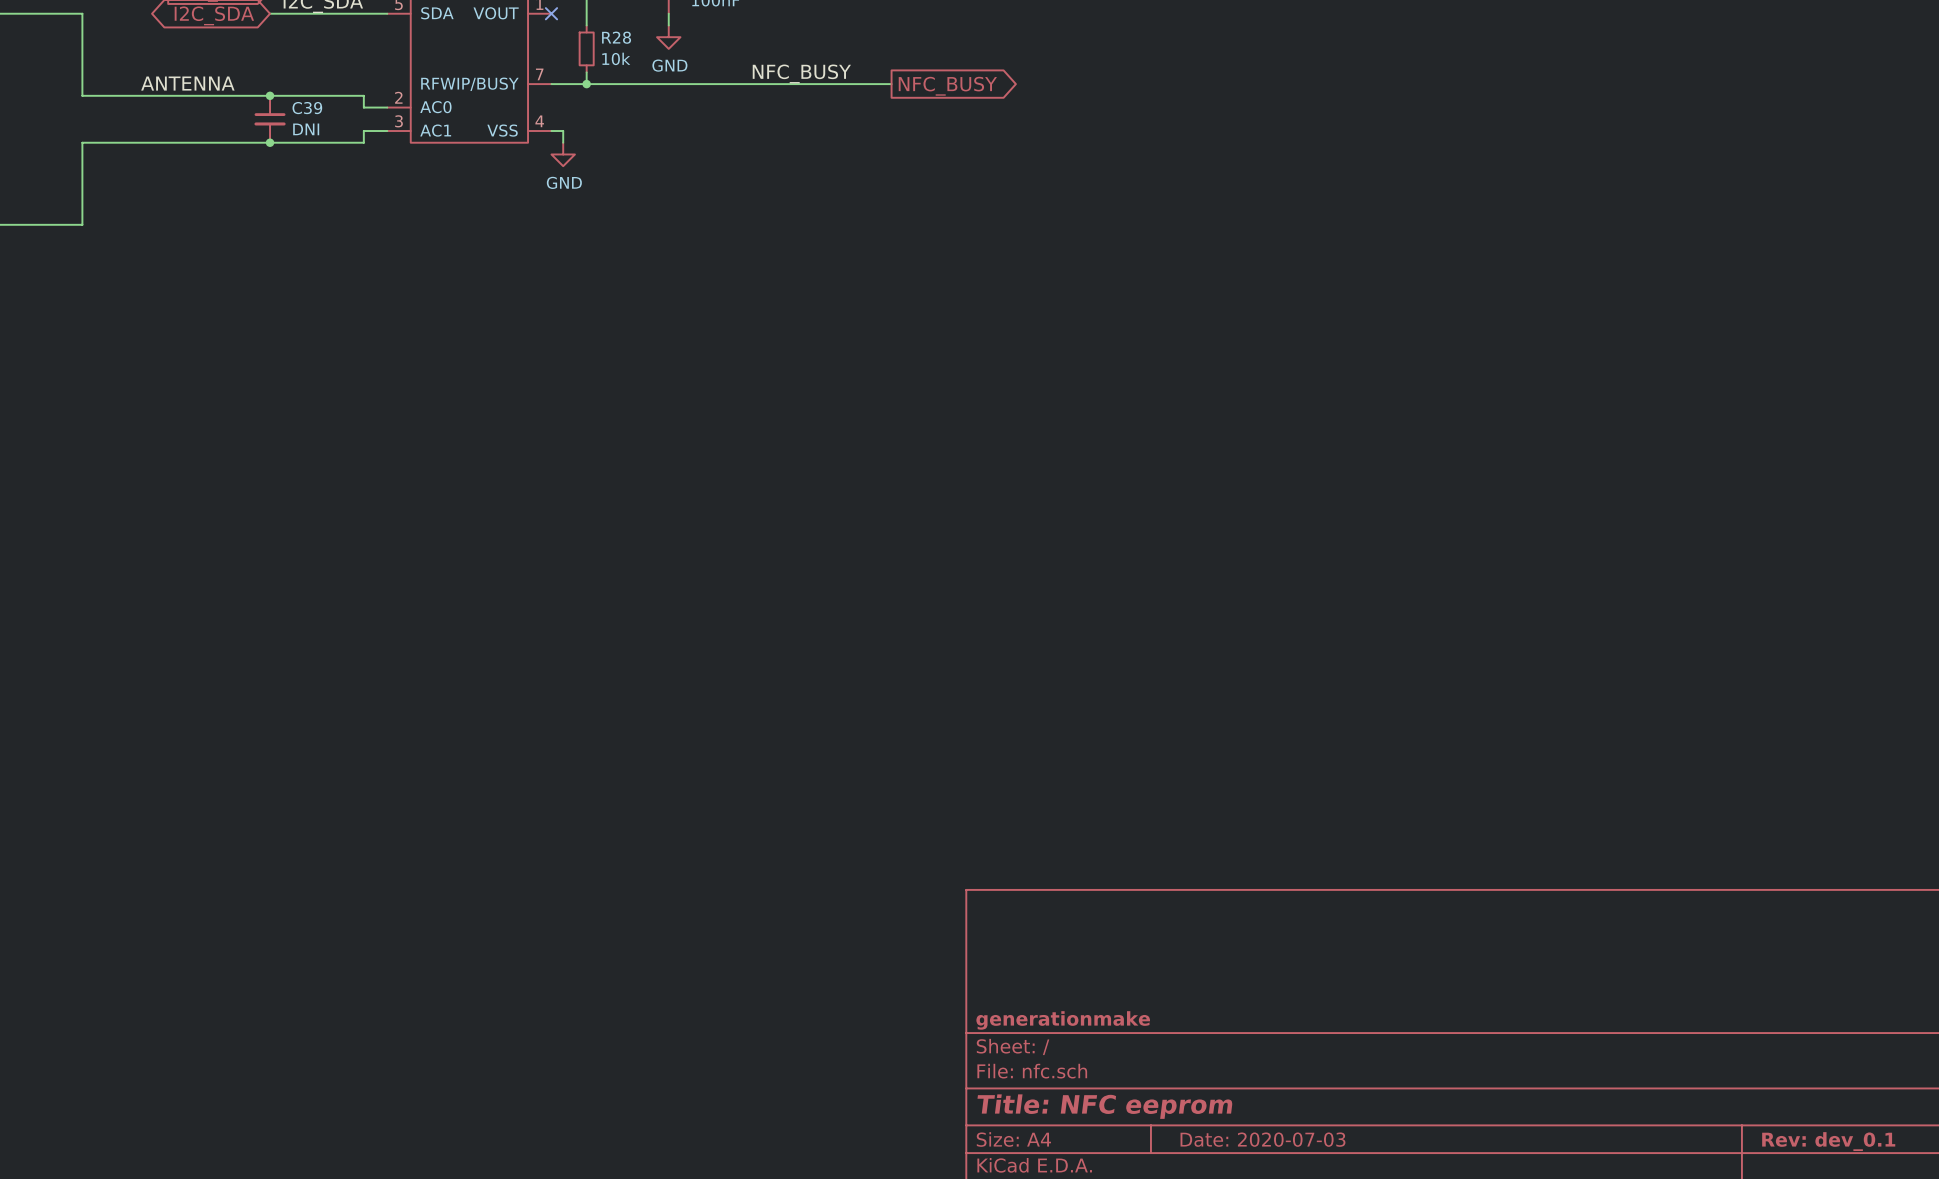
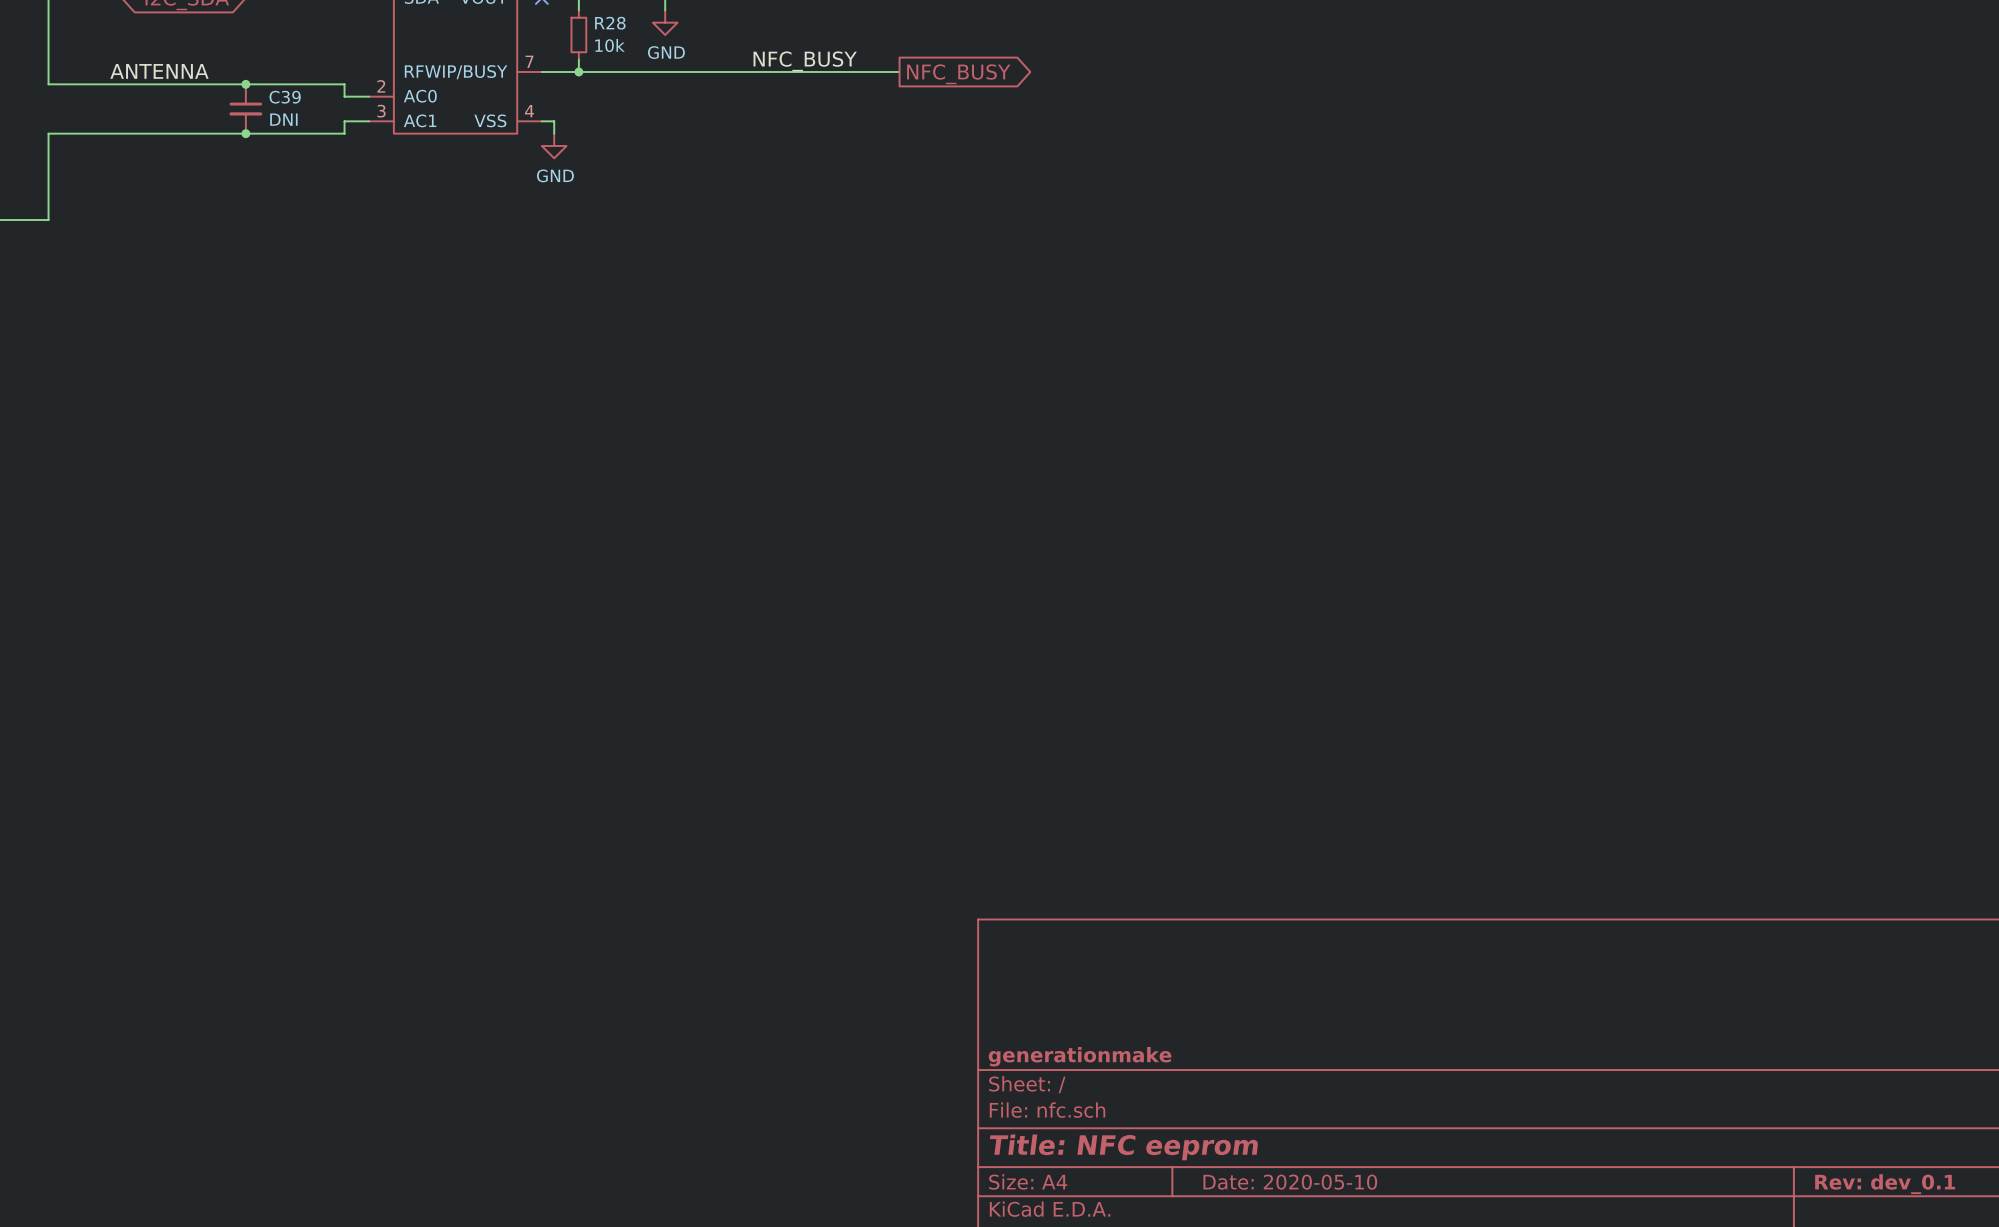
title block: Date: 2020-07-03 (1262, 1139) -> Date: 2020-05-10 (1290, 1182)

